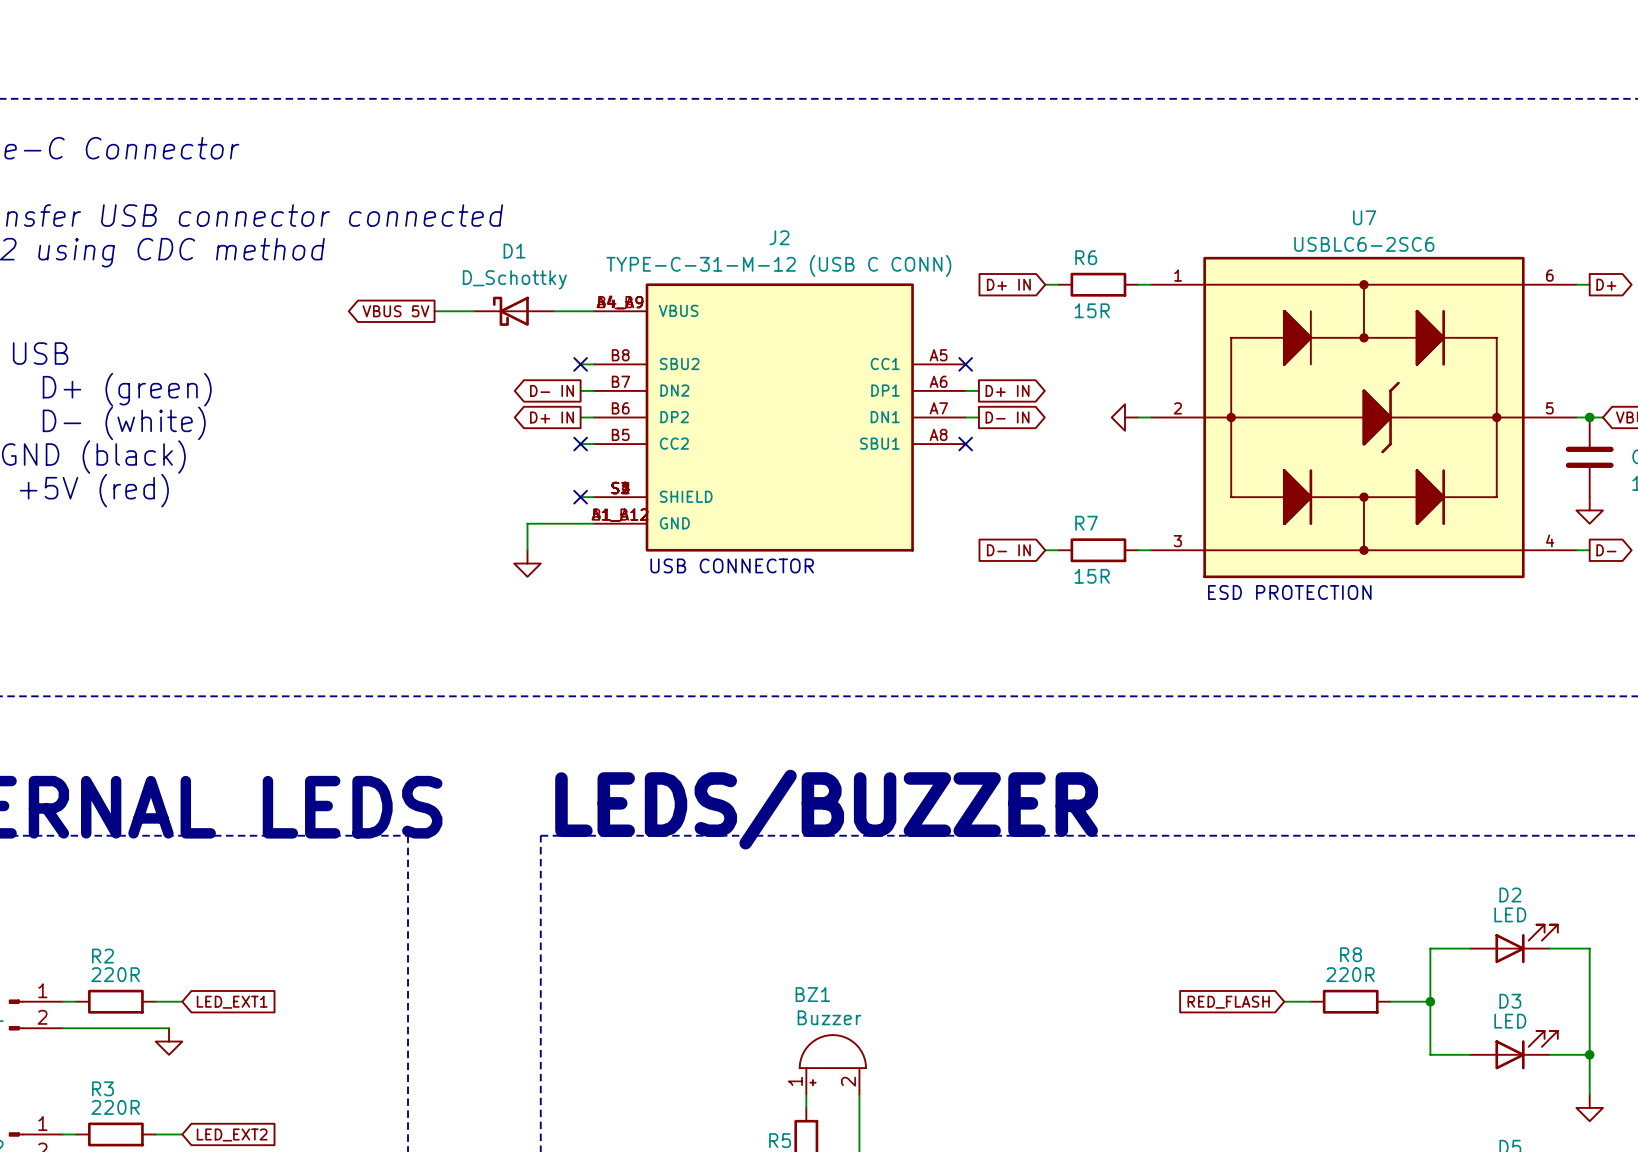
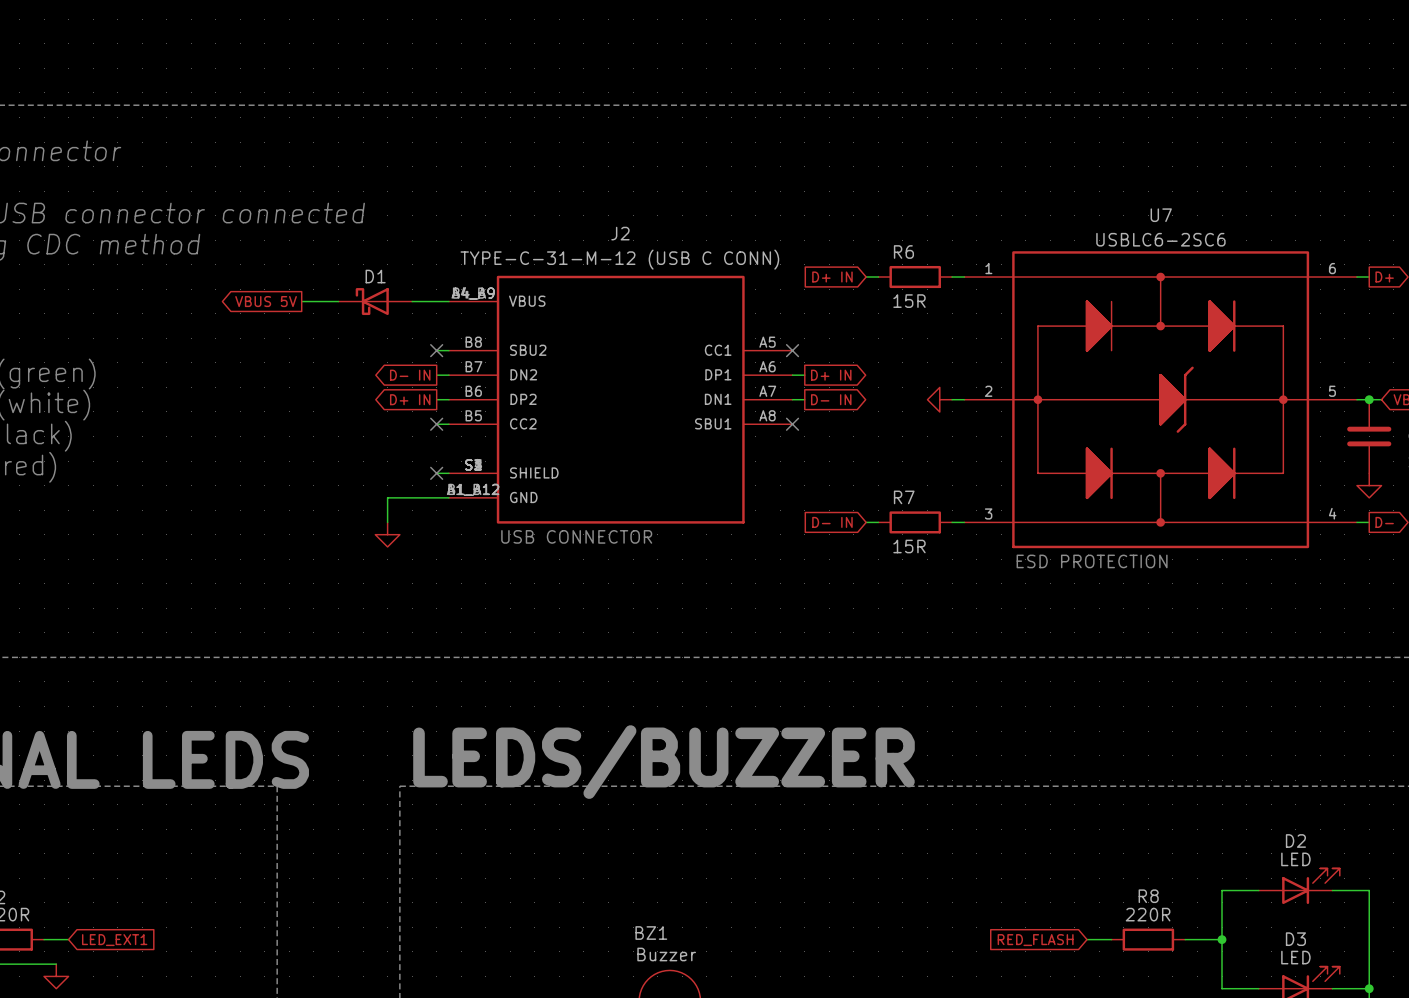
D1 name position: D1 (514, 251) -> D1 (375, 276)
D1 value: D_Schottky (514, 279) -> none

